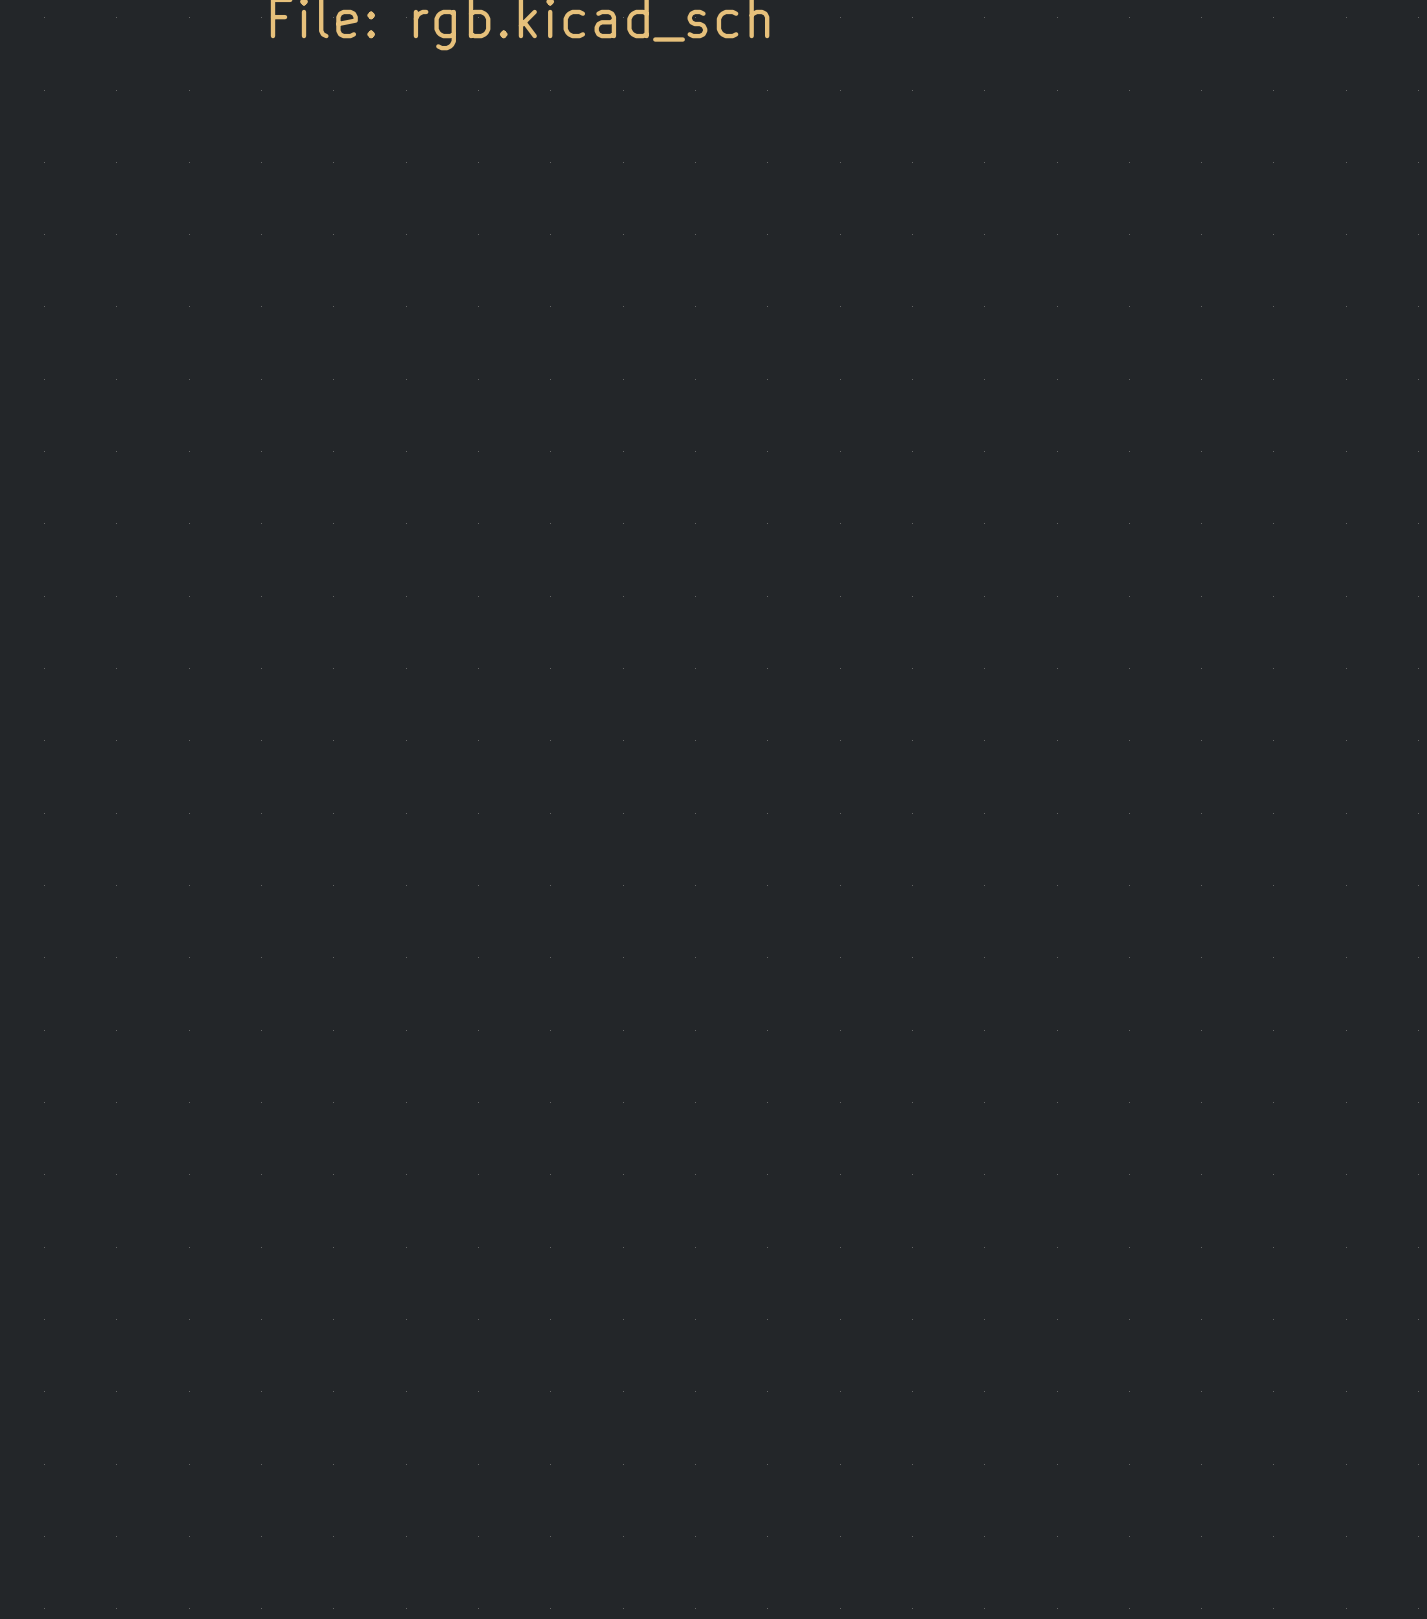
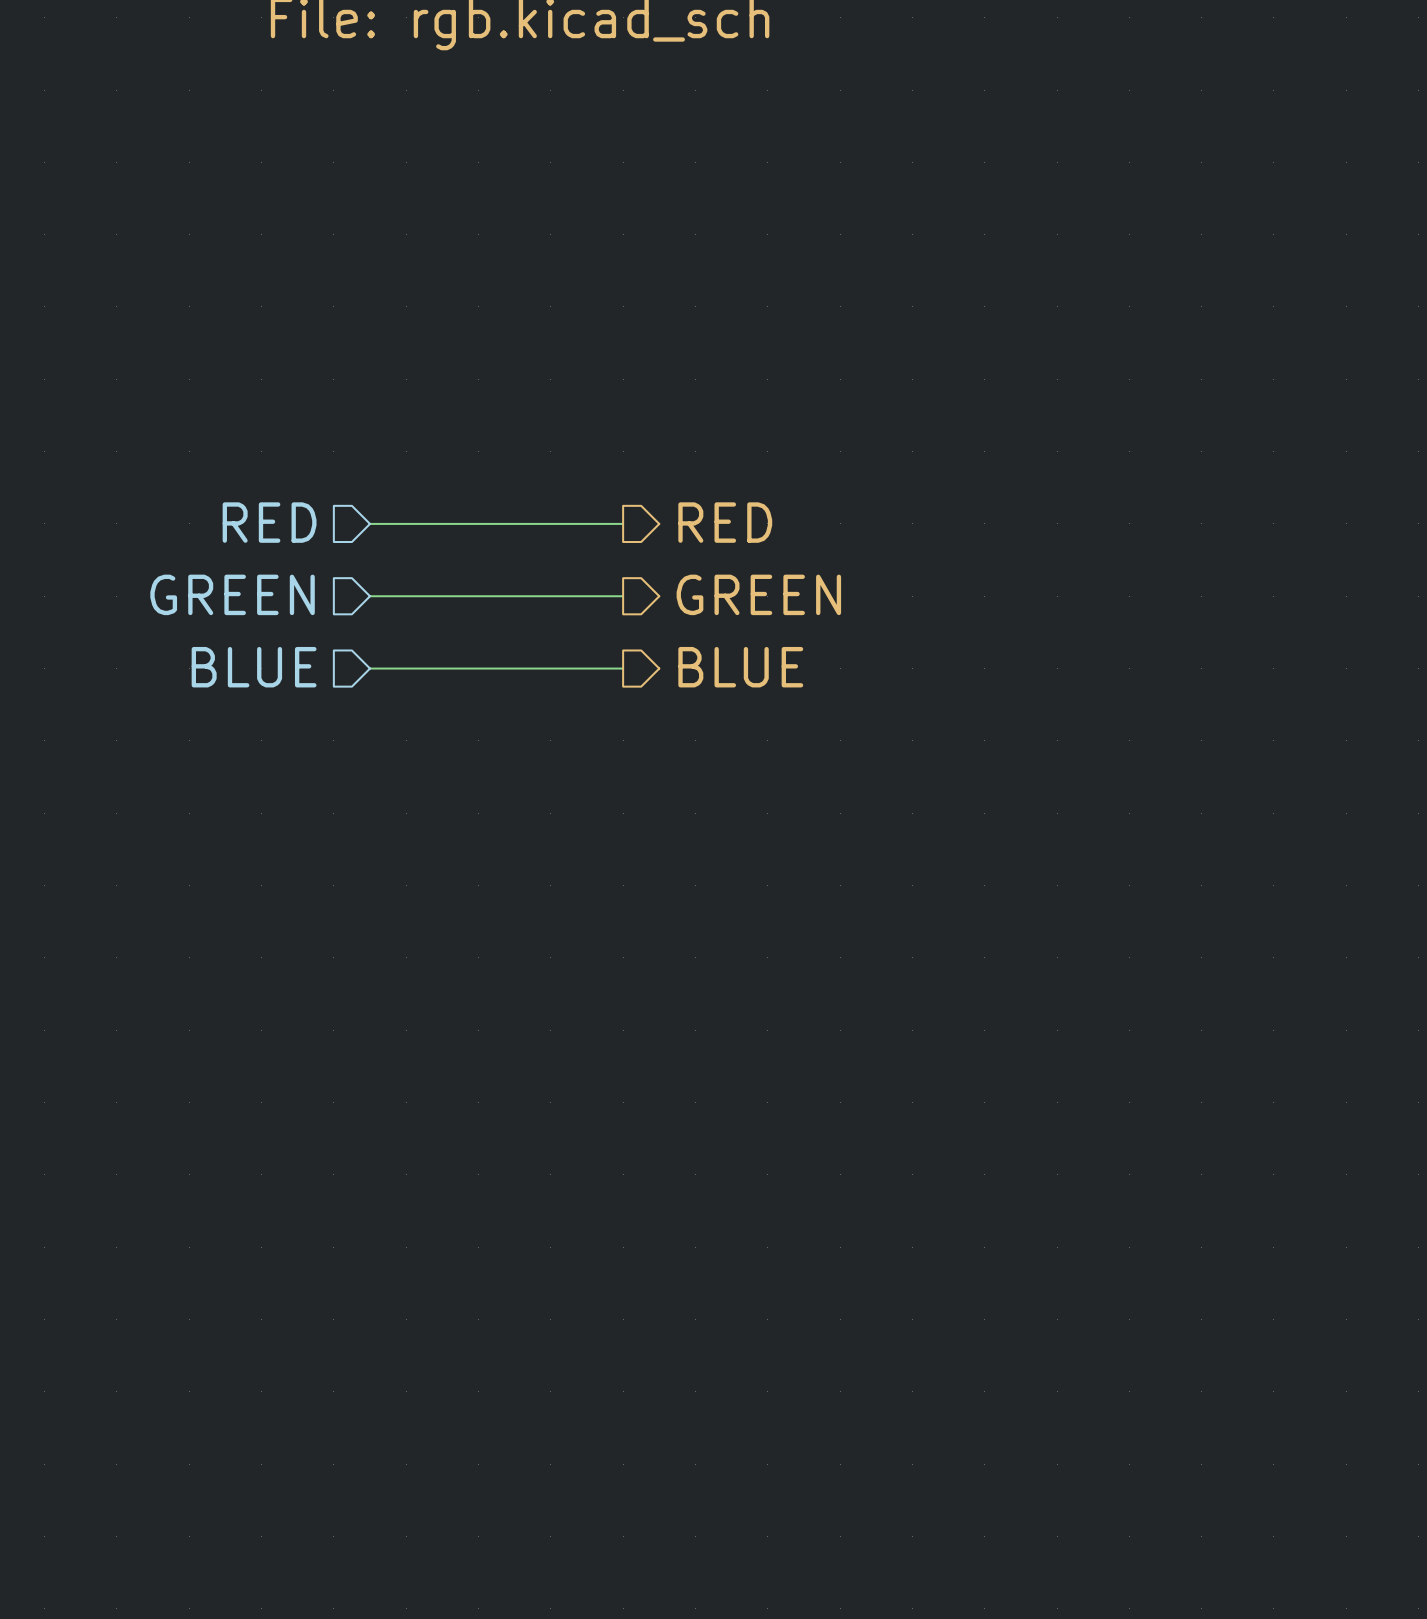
sheet pin: none -> RED (269, 522)
hierarchical label: none -> RED (725, 522)
wire: none -> (370, 523) (623, 523)
sheet pin: none -> GREEN (232, 594)
hierarchical label: none -> GREEN (758, 594)
wire: none -> (370, 596) (623, 596)
sheet pin: none -> BLUE (254, 667)
hierarchical label: none -> BLUE (740, 667)
wire: none -> (370, 668) (623, 668)

